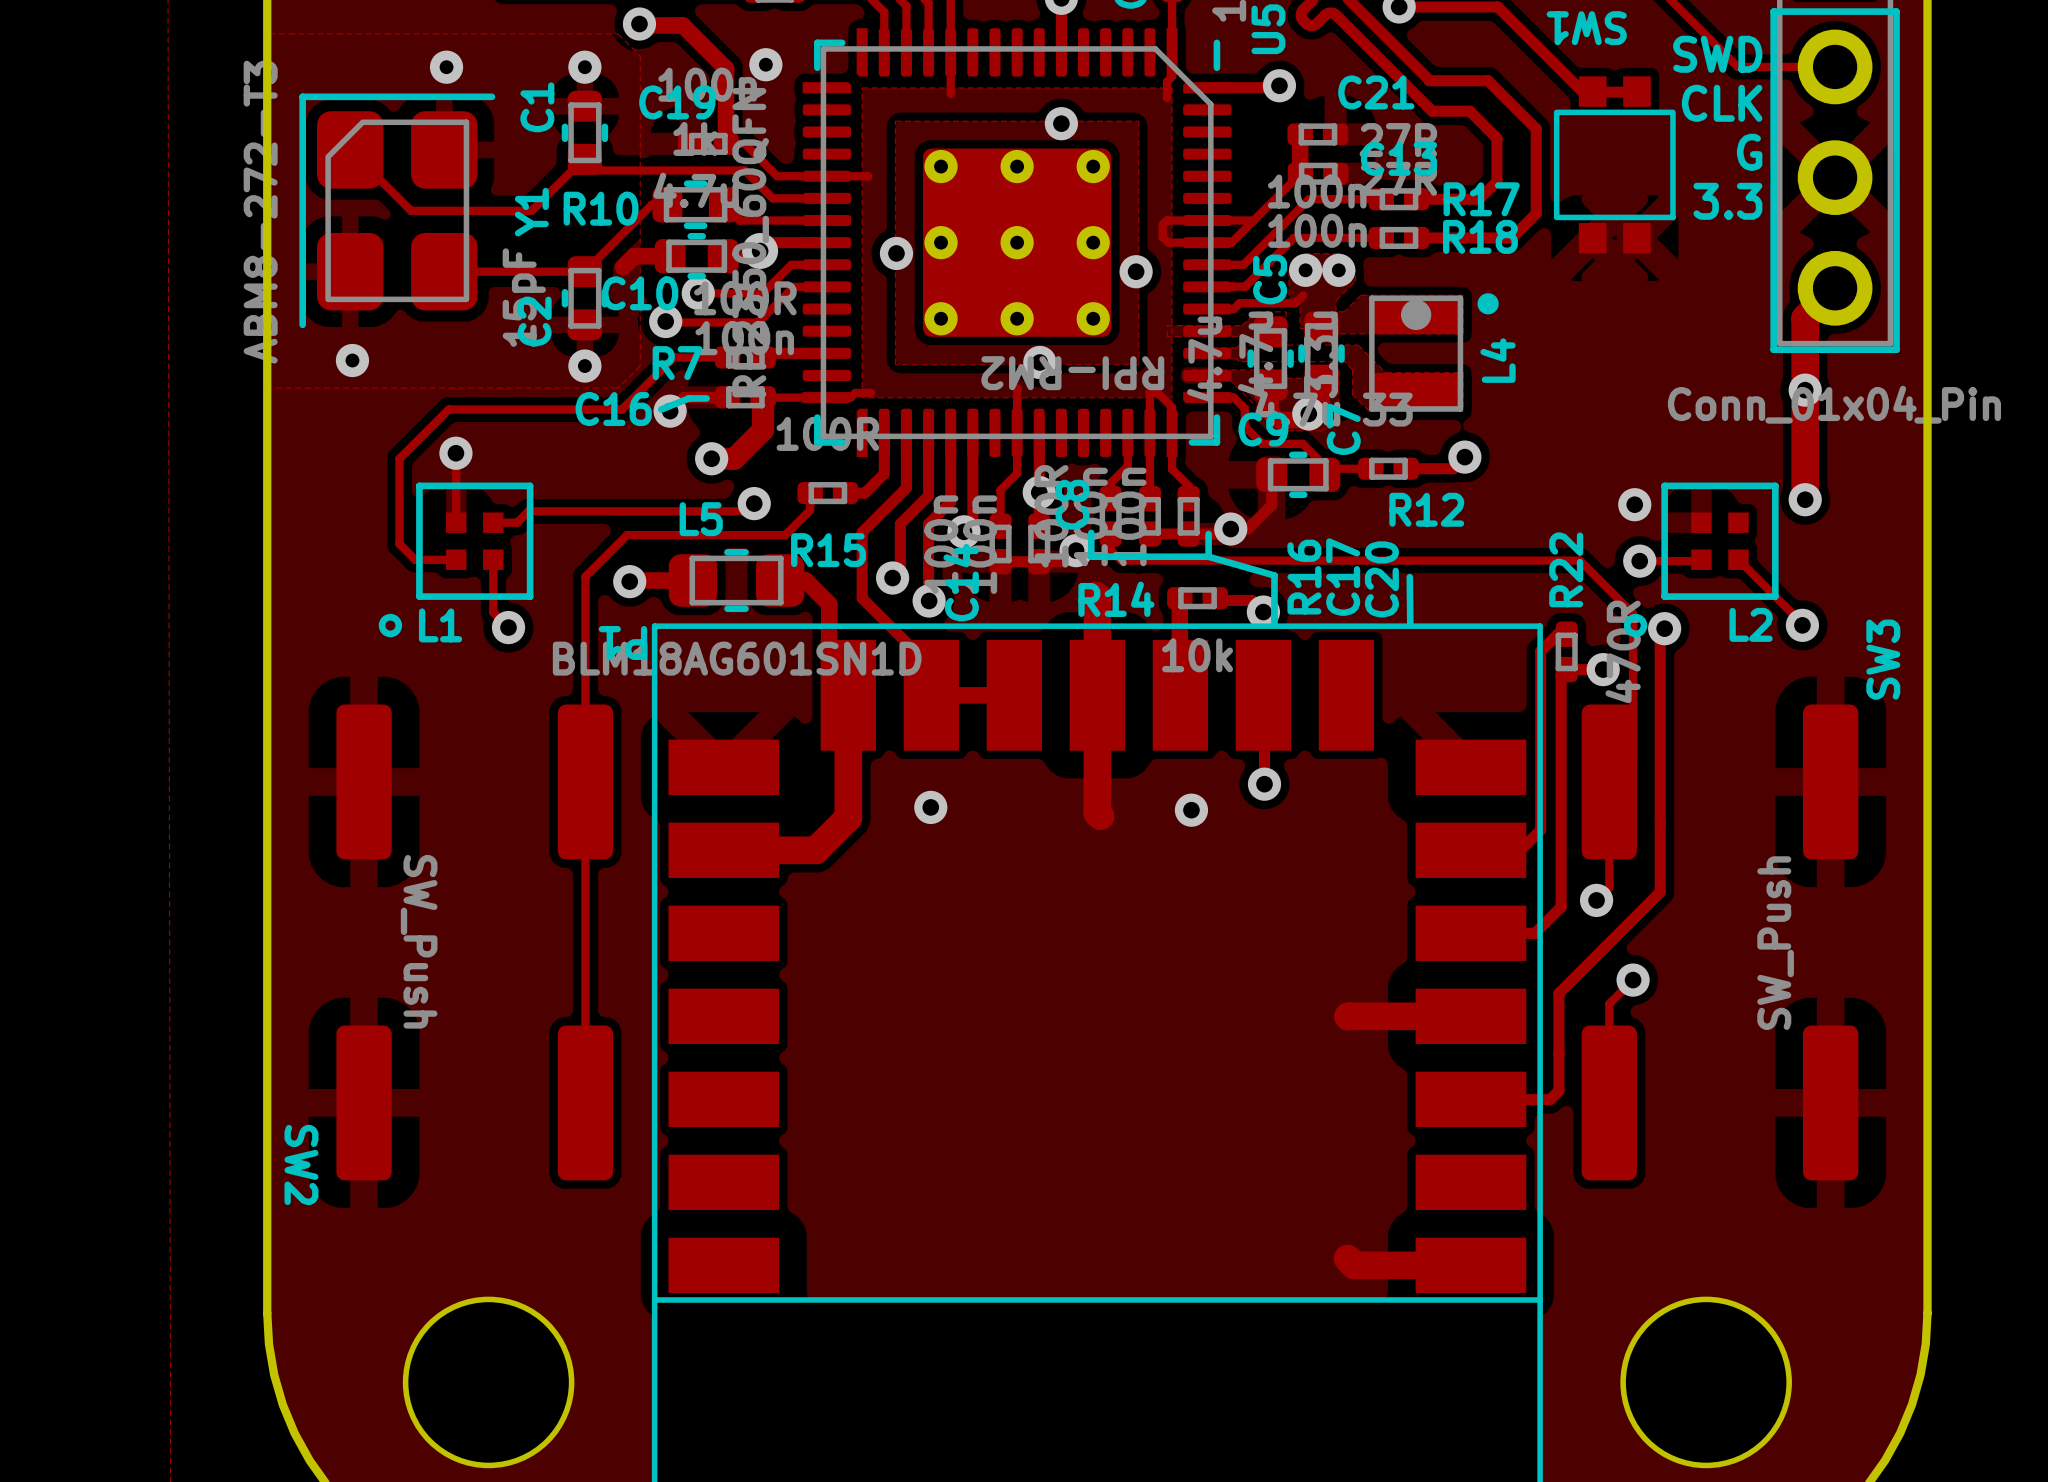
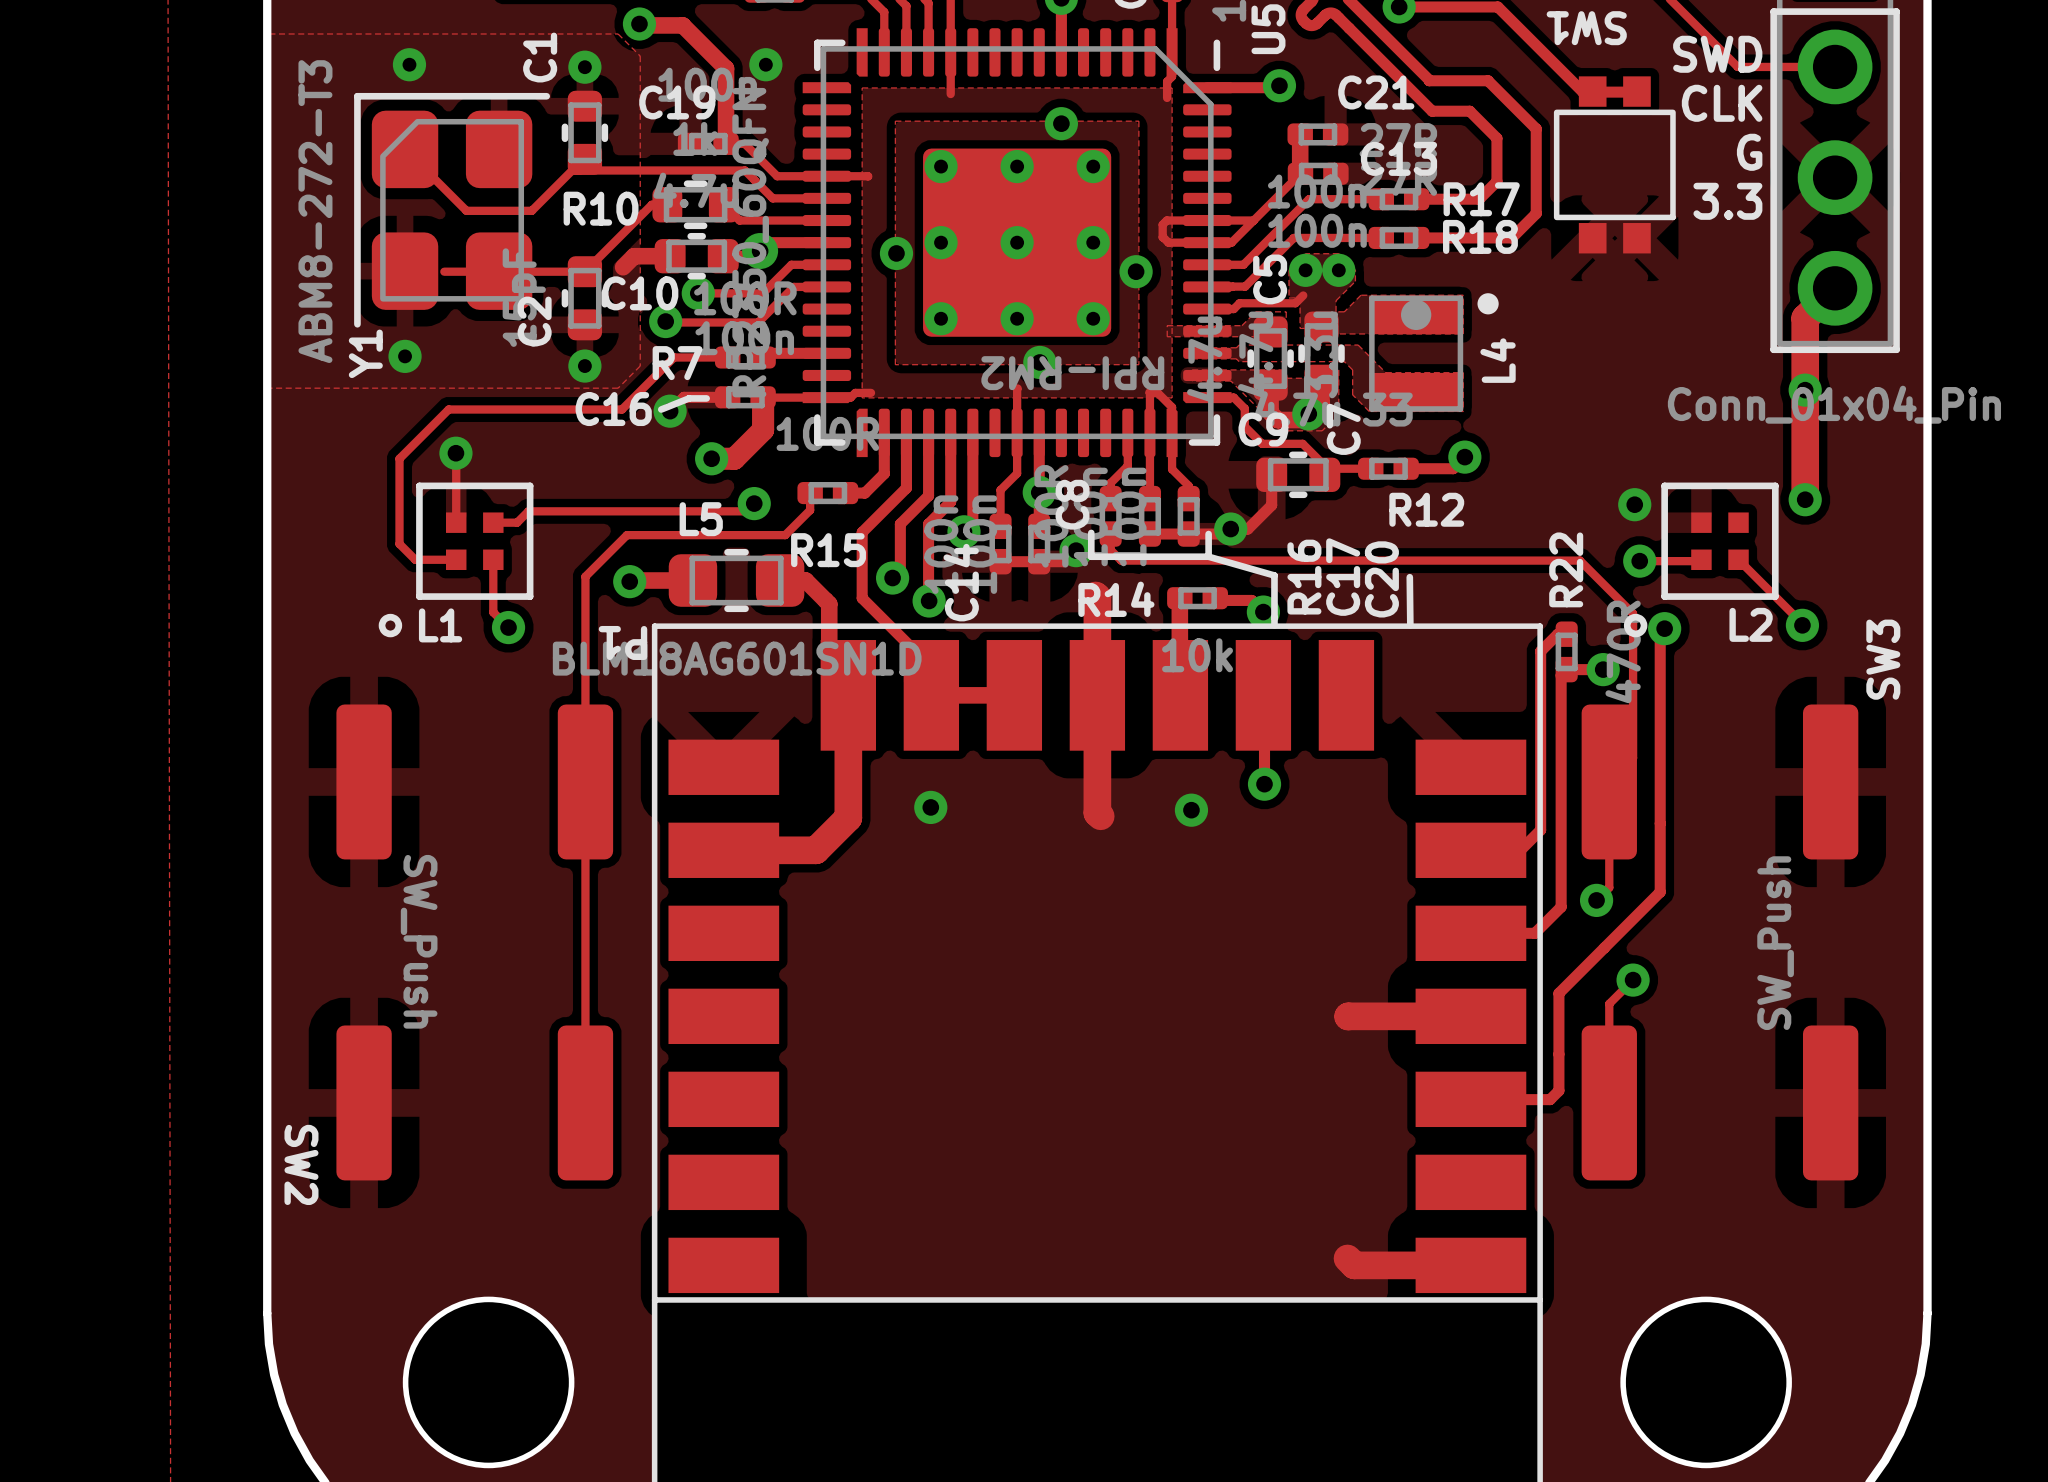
via position: (446, 67) -> (409, 64)
C1 name position: C1 (537, 107) -> C1 (540, 57)
track: (350, 149) (411, 210) (466, 210) -> (405, 149) (466, 210)
Y1 position: (397, 210) -> (452, 210)
Y1 name position: Y1 (531, 212) -> Y1 (365, 353)
via position: (352, 360) -> (405, 356)

